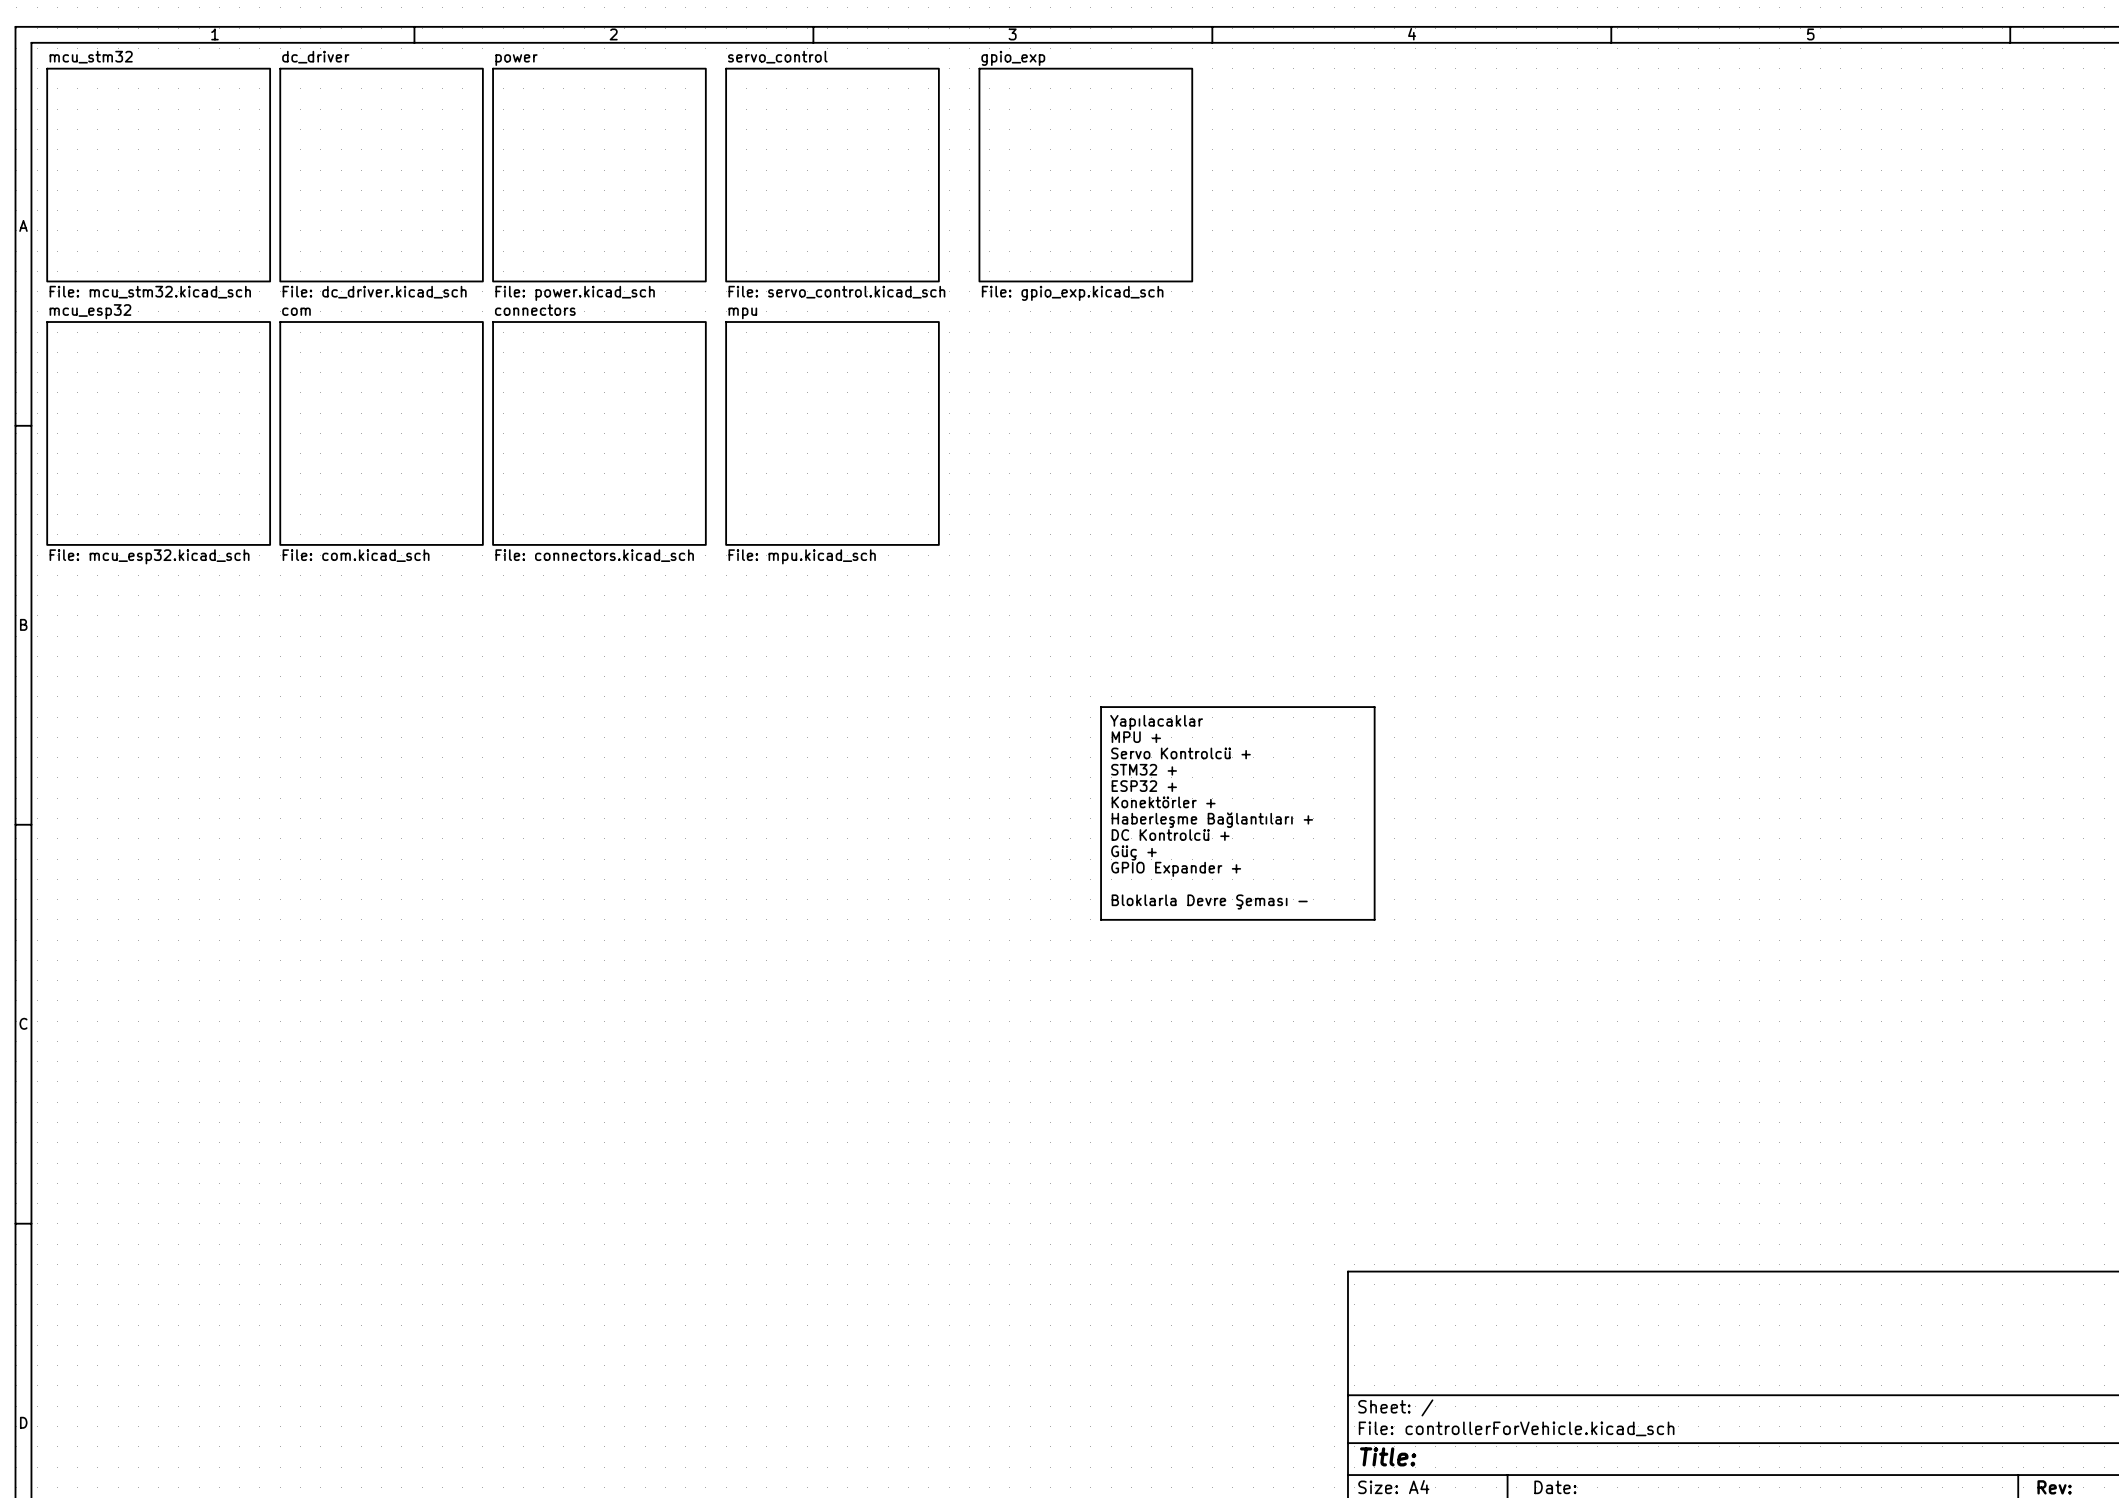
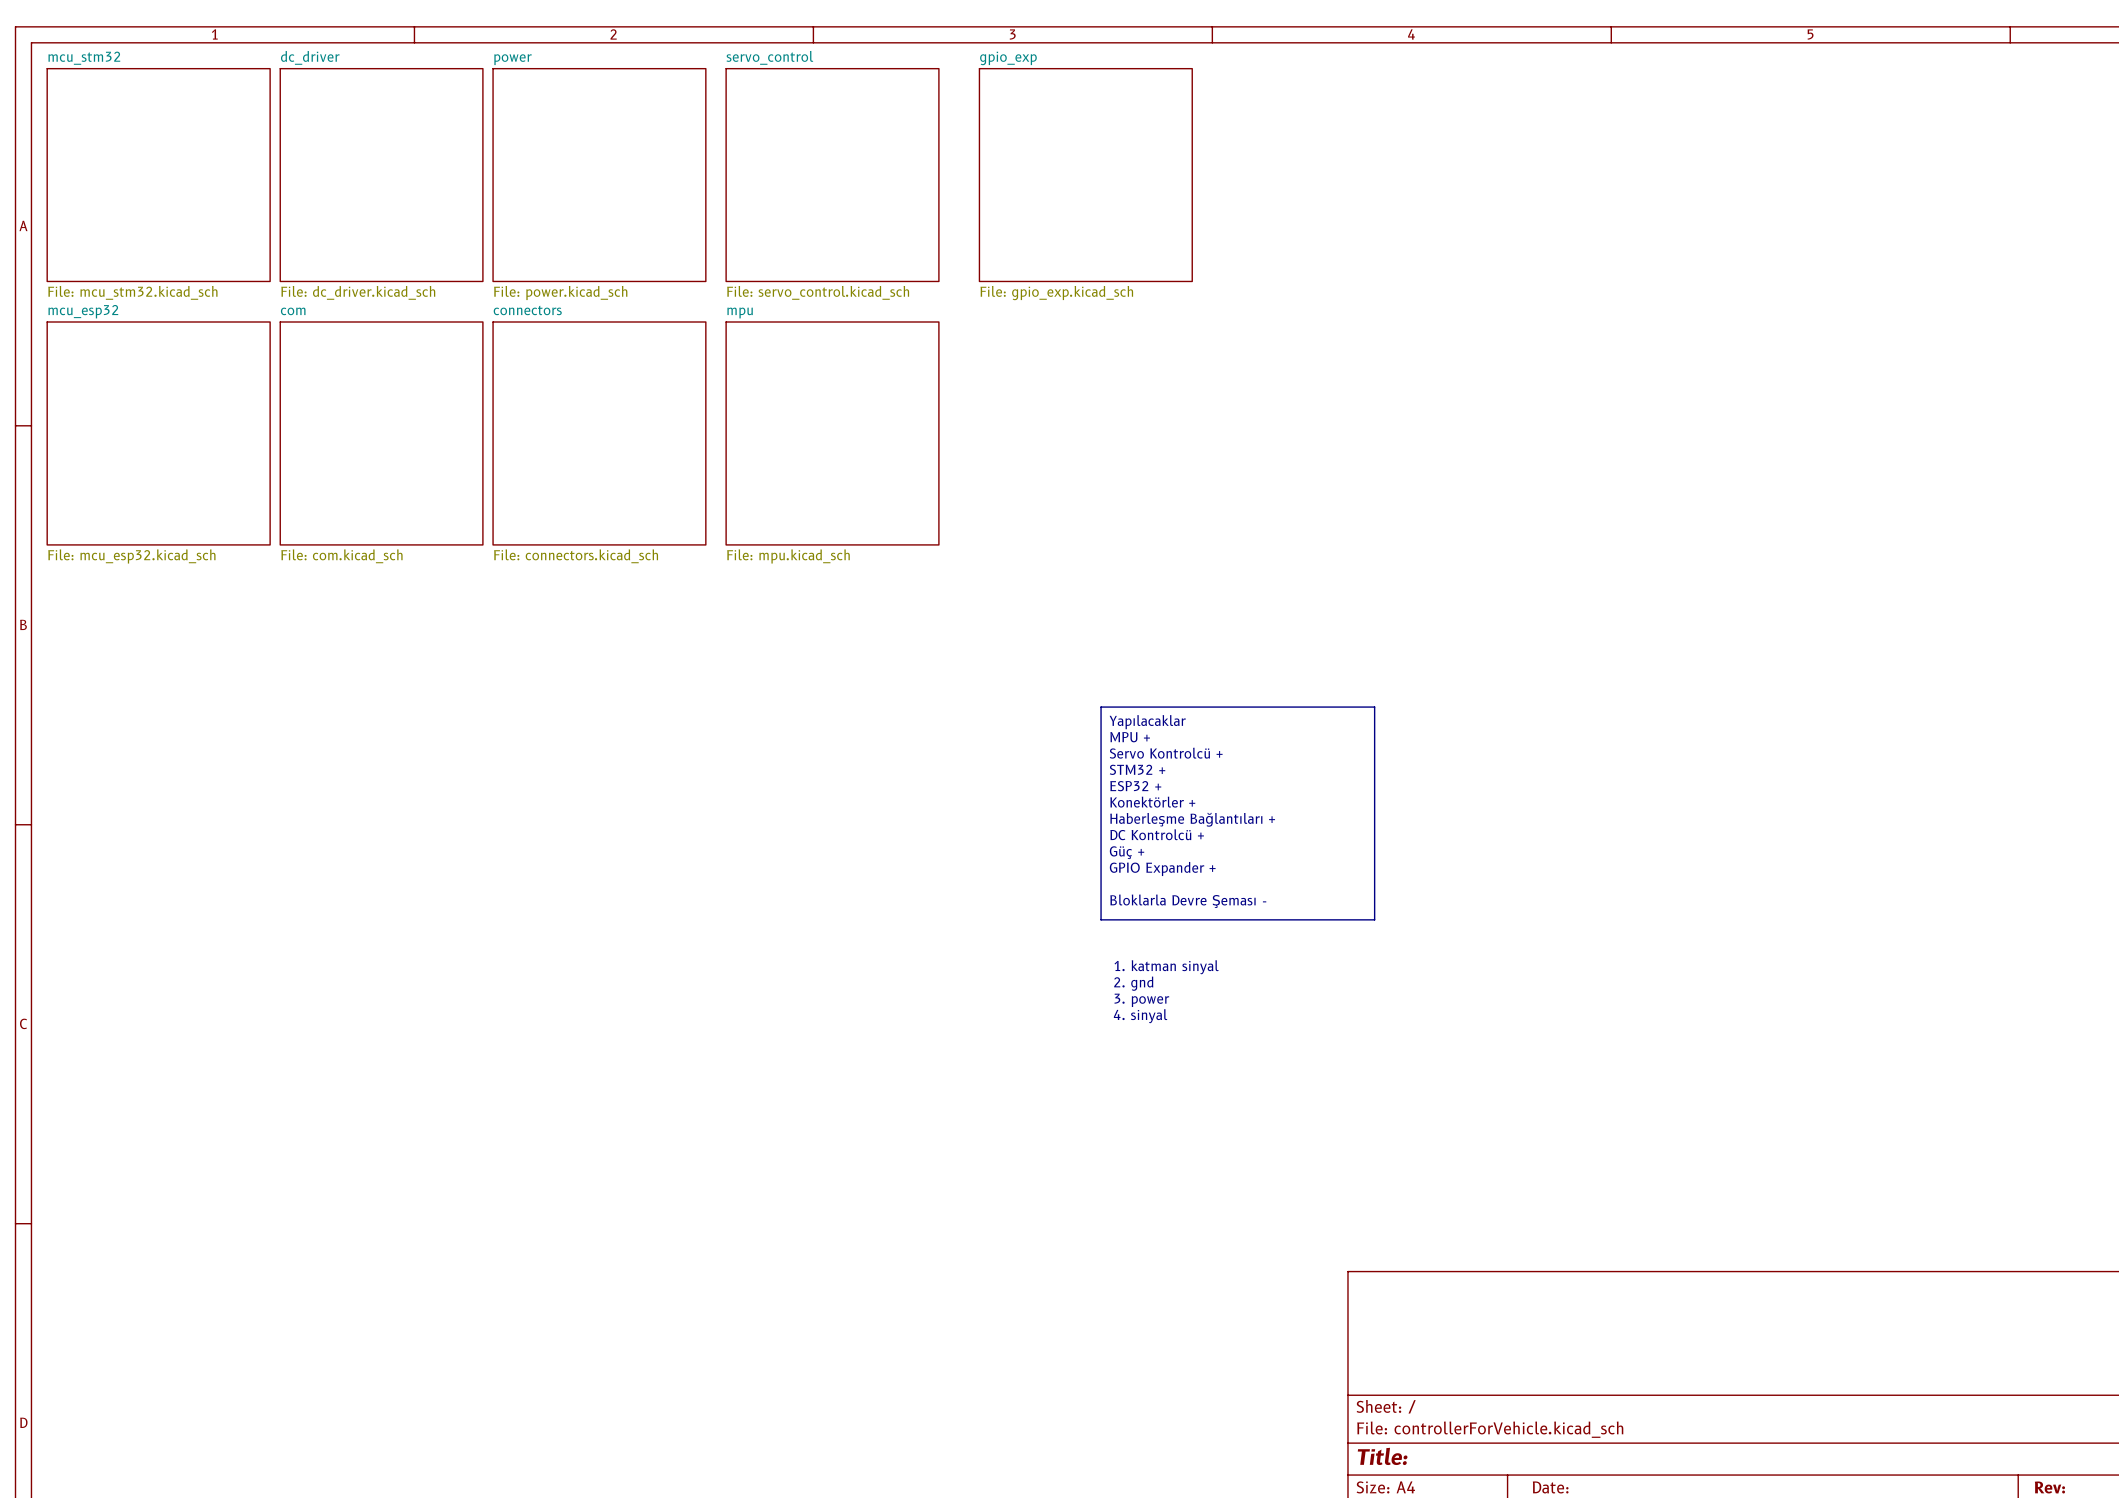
text: none -> 1. katman sinyal (1166, 967)
text: none -> 2. gnd (1133, 983)
text: none -> 3. power (1141, 1000)
text: none -> 4. sinyal (1140, 1016)

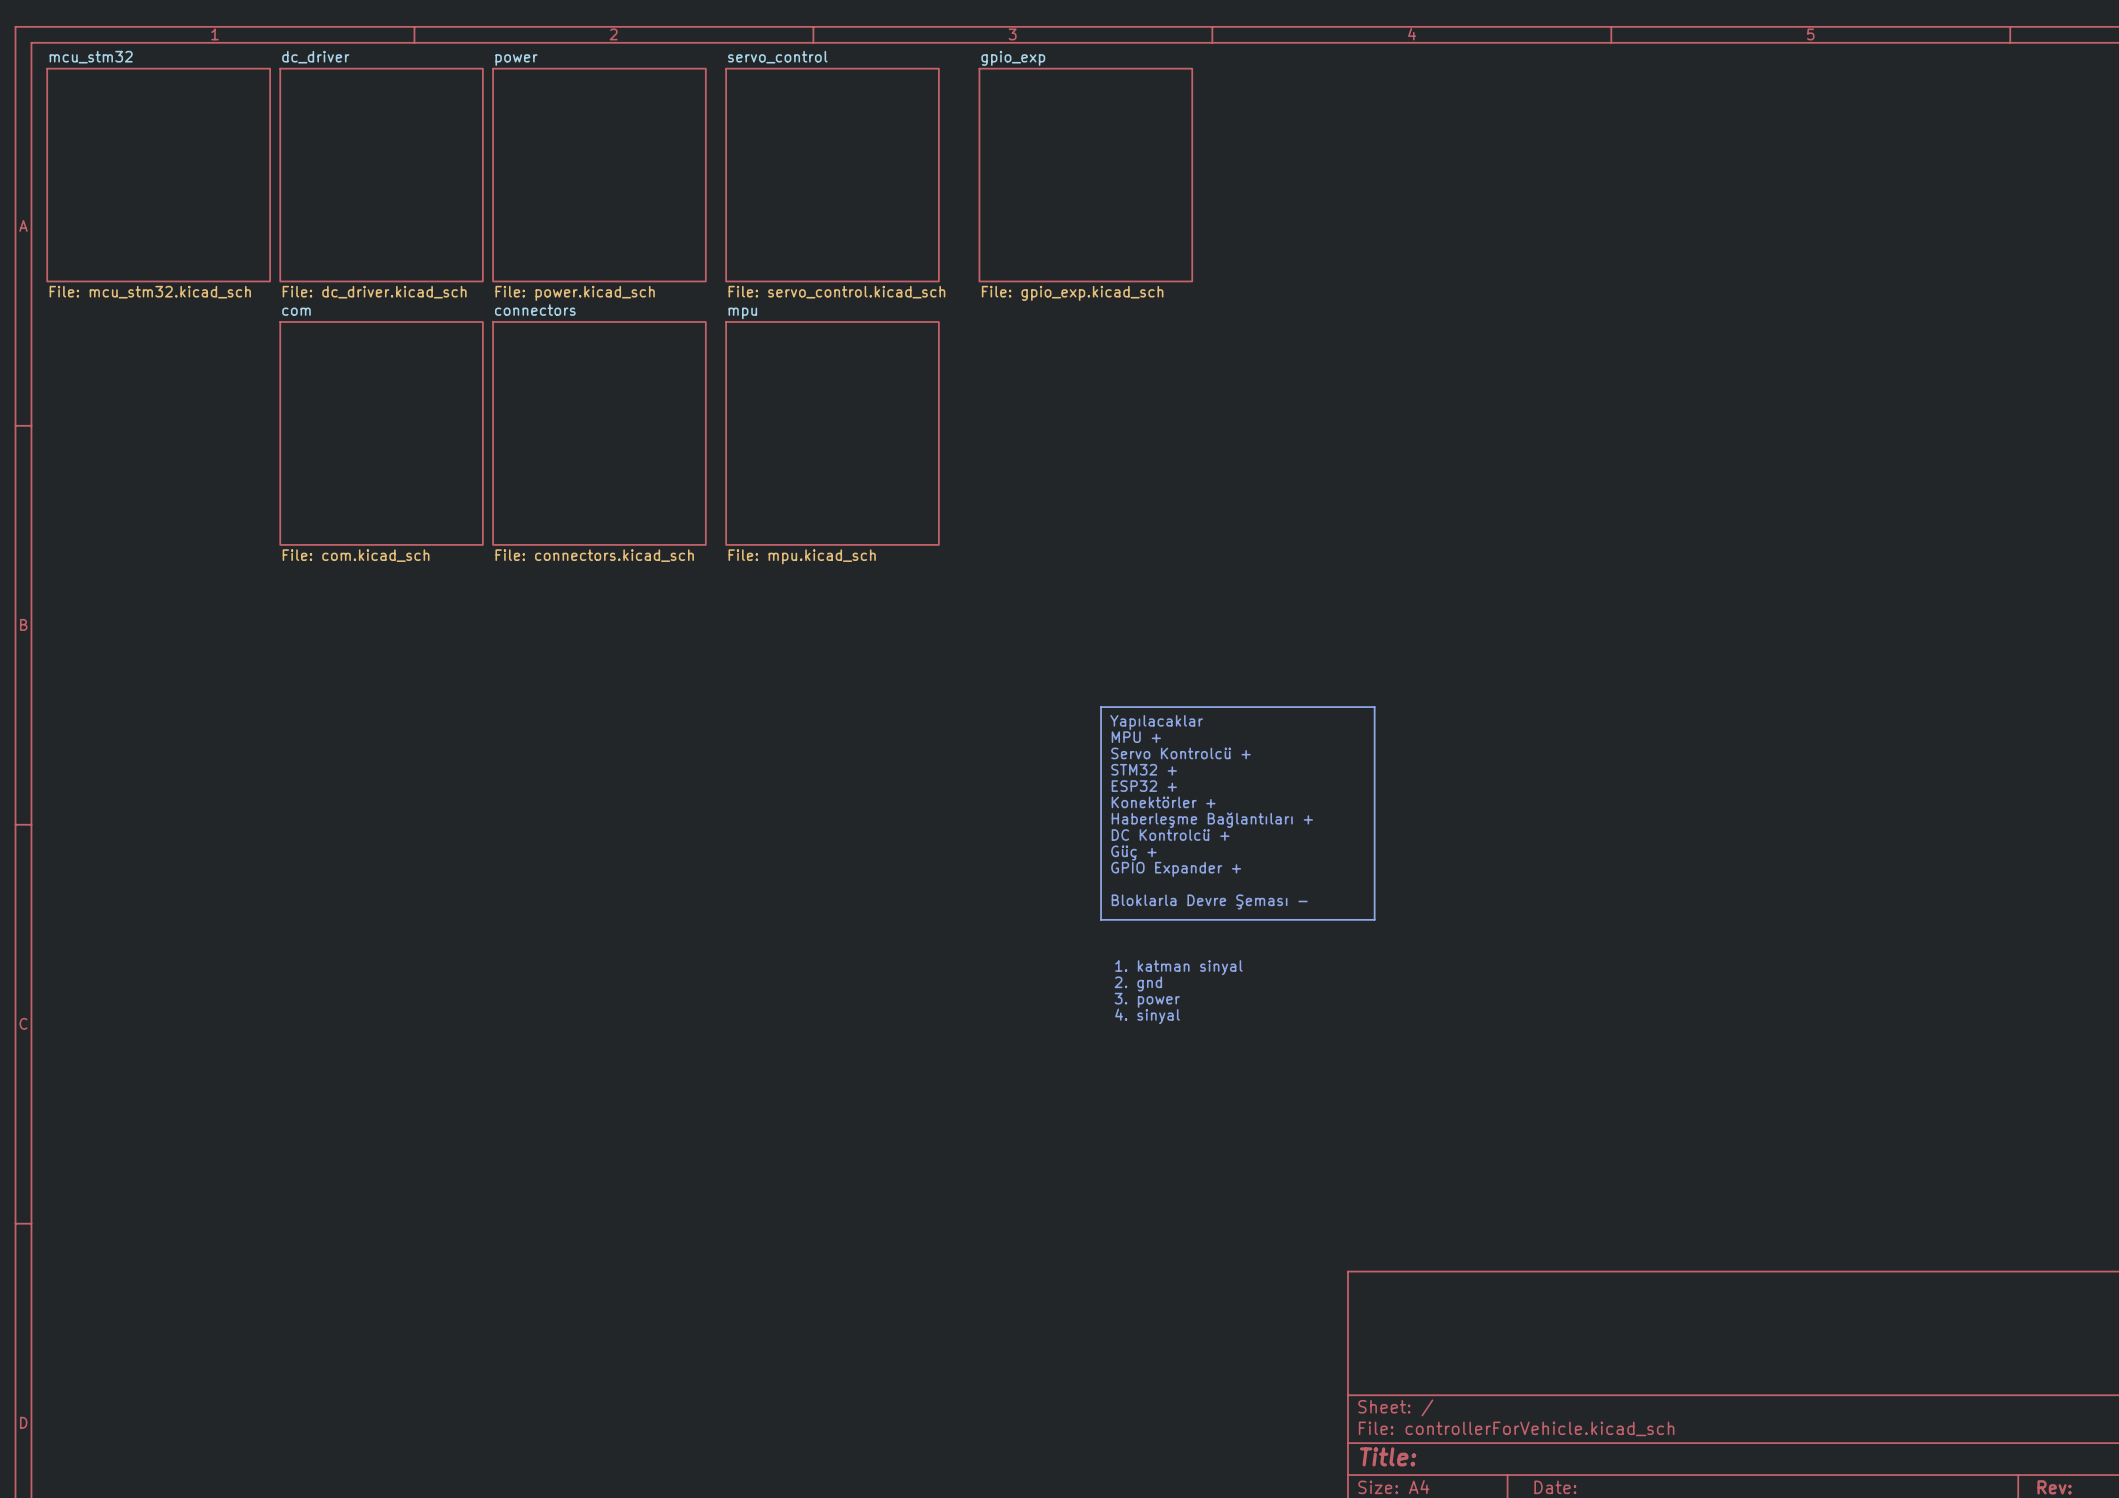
sheet mcu_esp32: File: mcu_esp32.kicad_sch (158, 433) -> none

